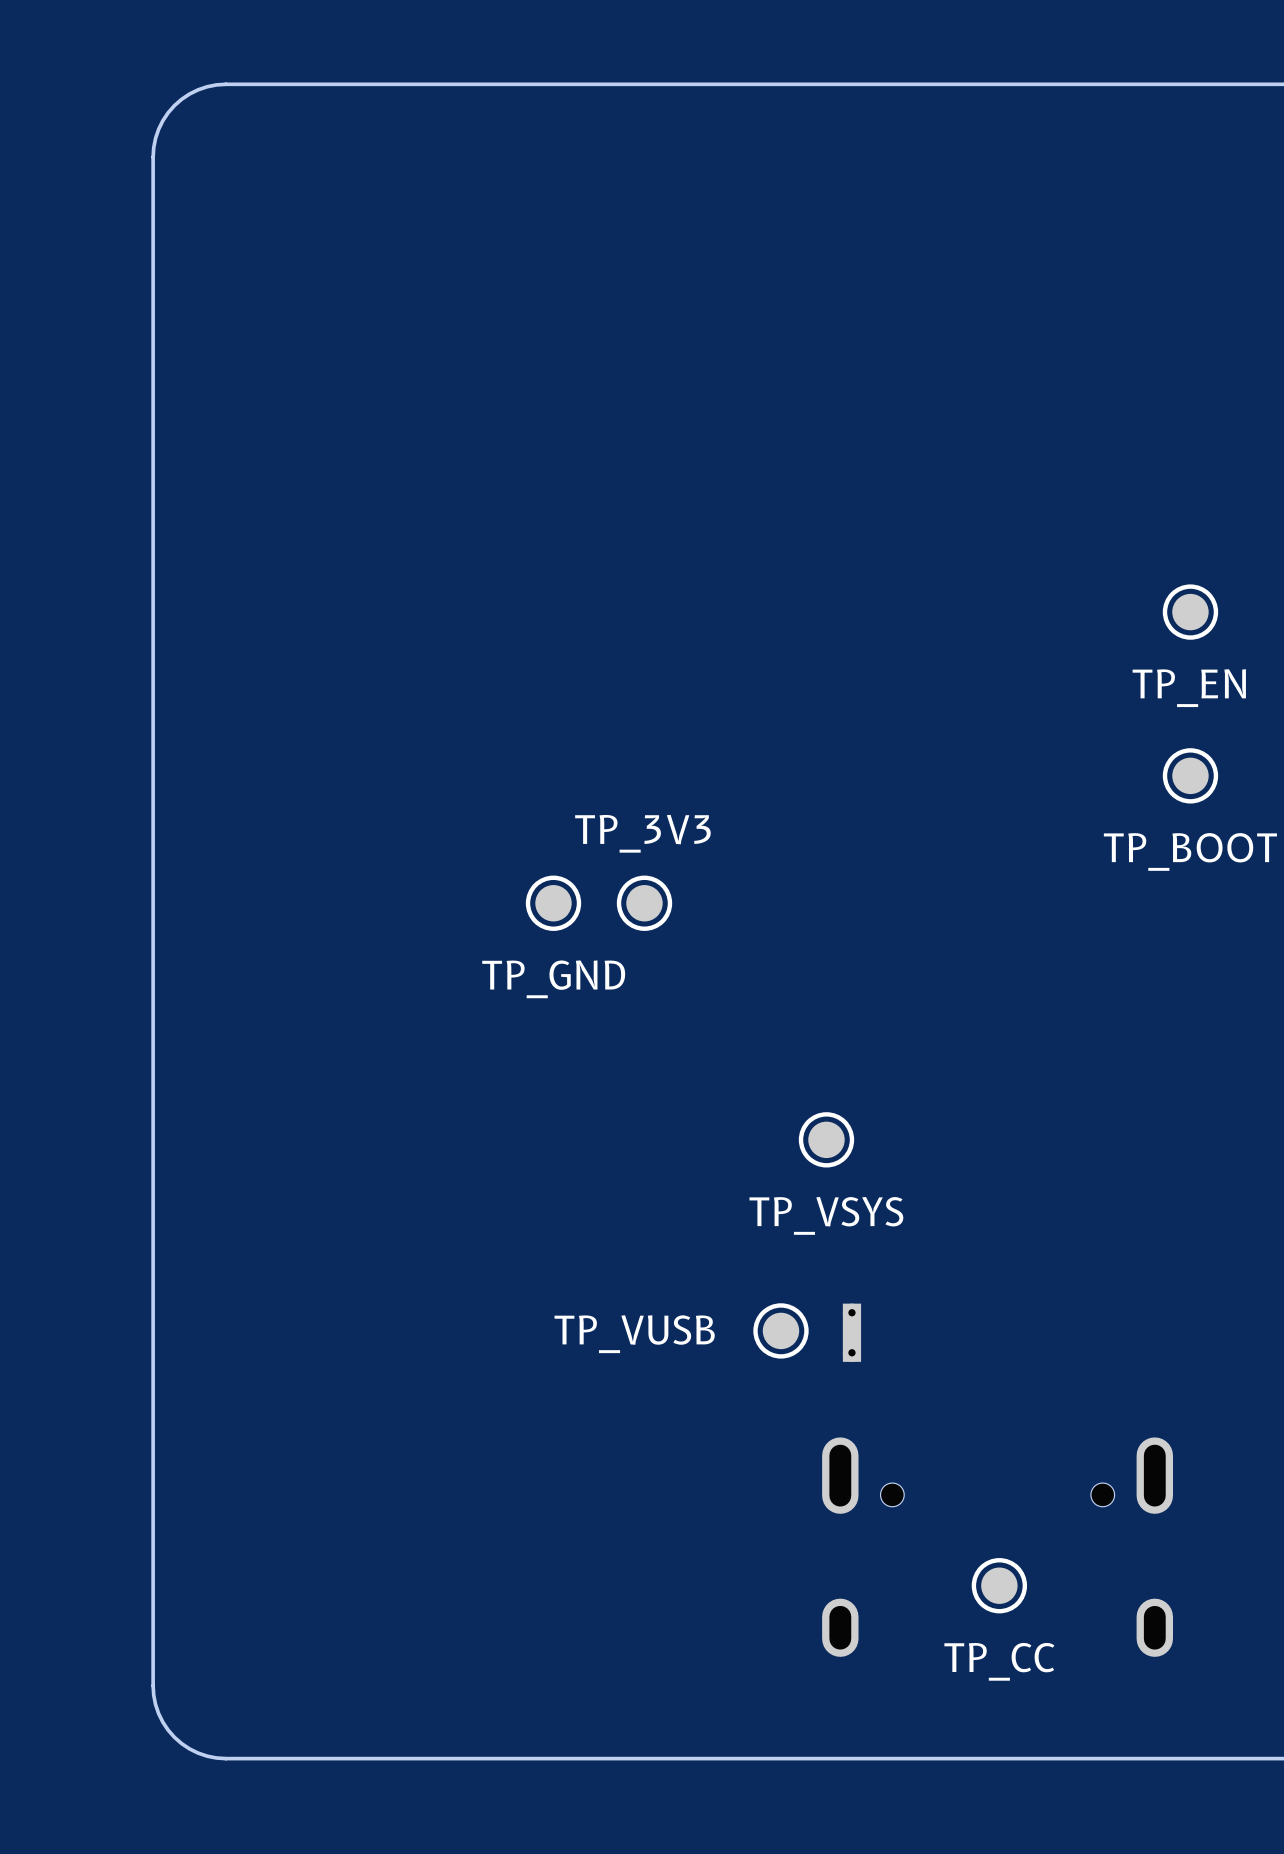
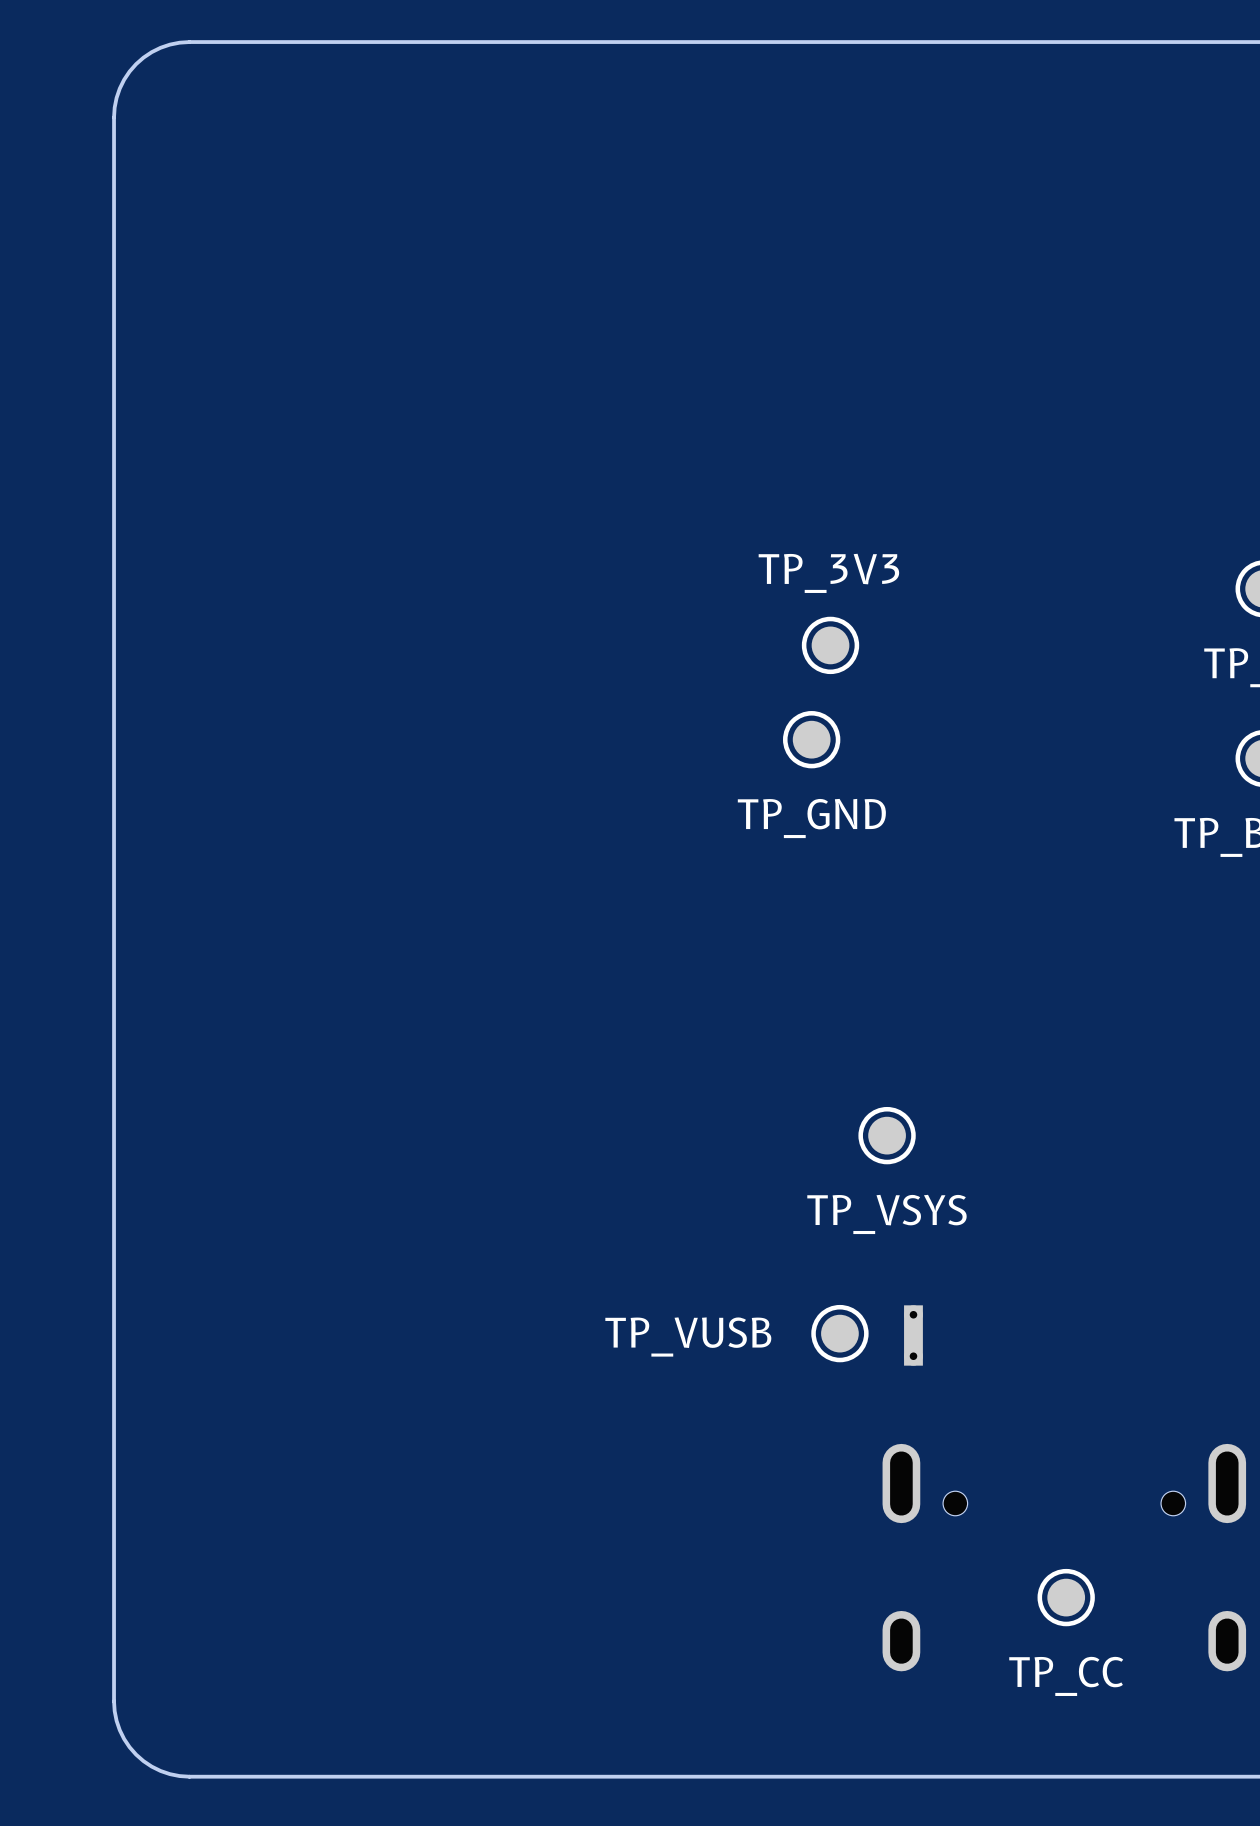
board edge: (225, 84) (198, 89) (174, 105) (158, 129) (153, 157) (153, 1685) (158, 1713) (174, 1737) (198, 1753) (225, 1758) -> (264, 42) (179, 42) (151, 52) (136, 64) (124, 79) (116, 97) (114, 117) (114, 1711) (119, 1730) (129, 1747) (143, 1761) (160, 1770) (189, 1776) (264, 1776)
TP_GND position: (553, 903) -> (811, 739)
TP_3V3 position: (644, 903) -> (830, 645)

